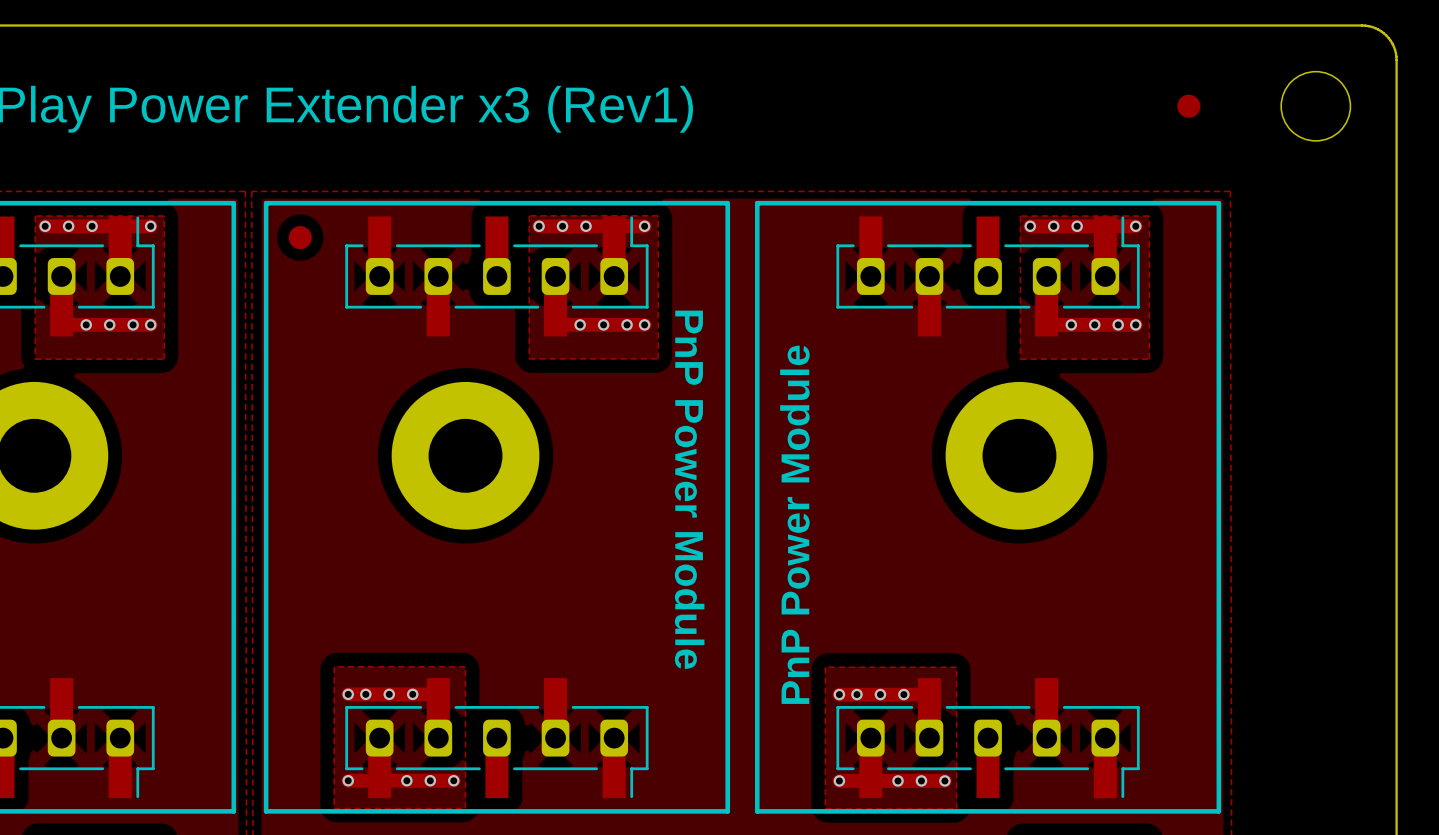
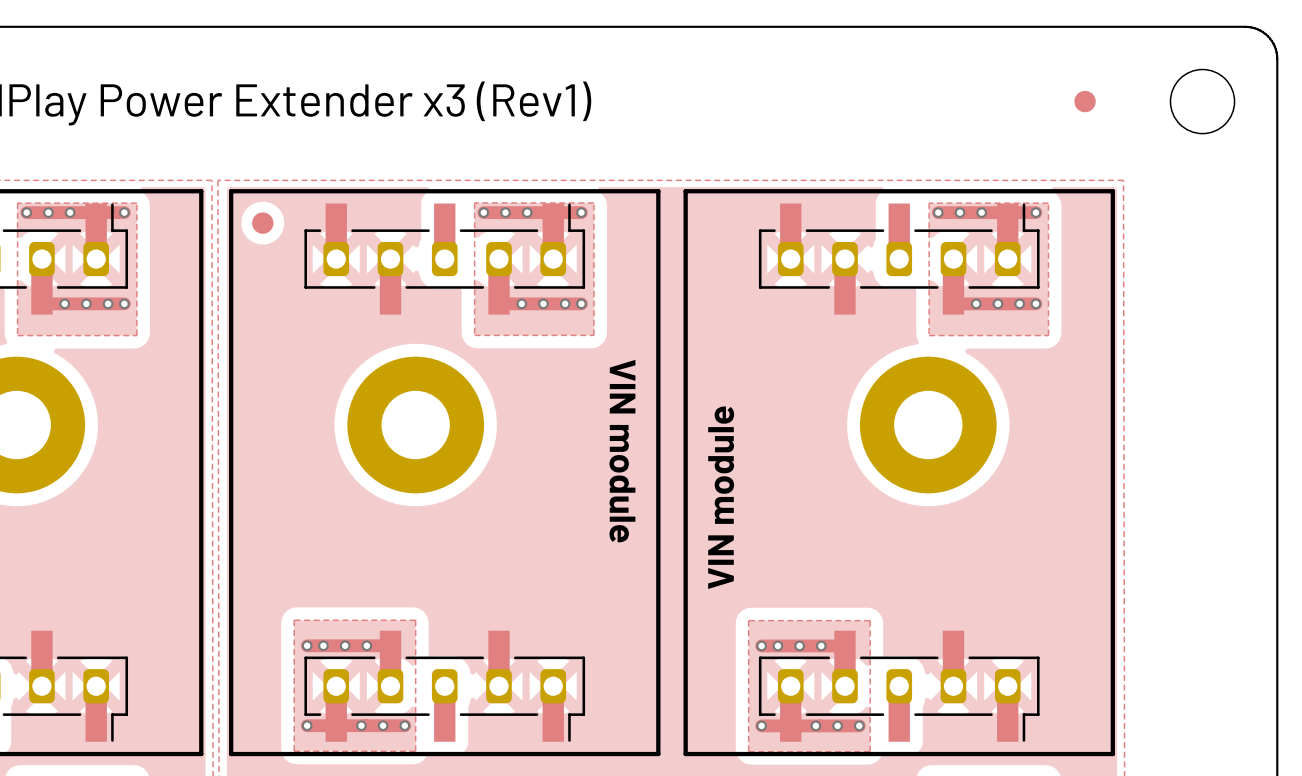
text: PnP Power Module (689, 489) -> none
text: none -> VIN module (622, 451)
text: none -> VIN module (721, 497)
text: PnP Power Module (794, 524) -> none

